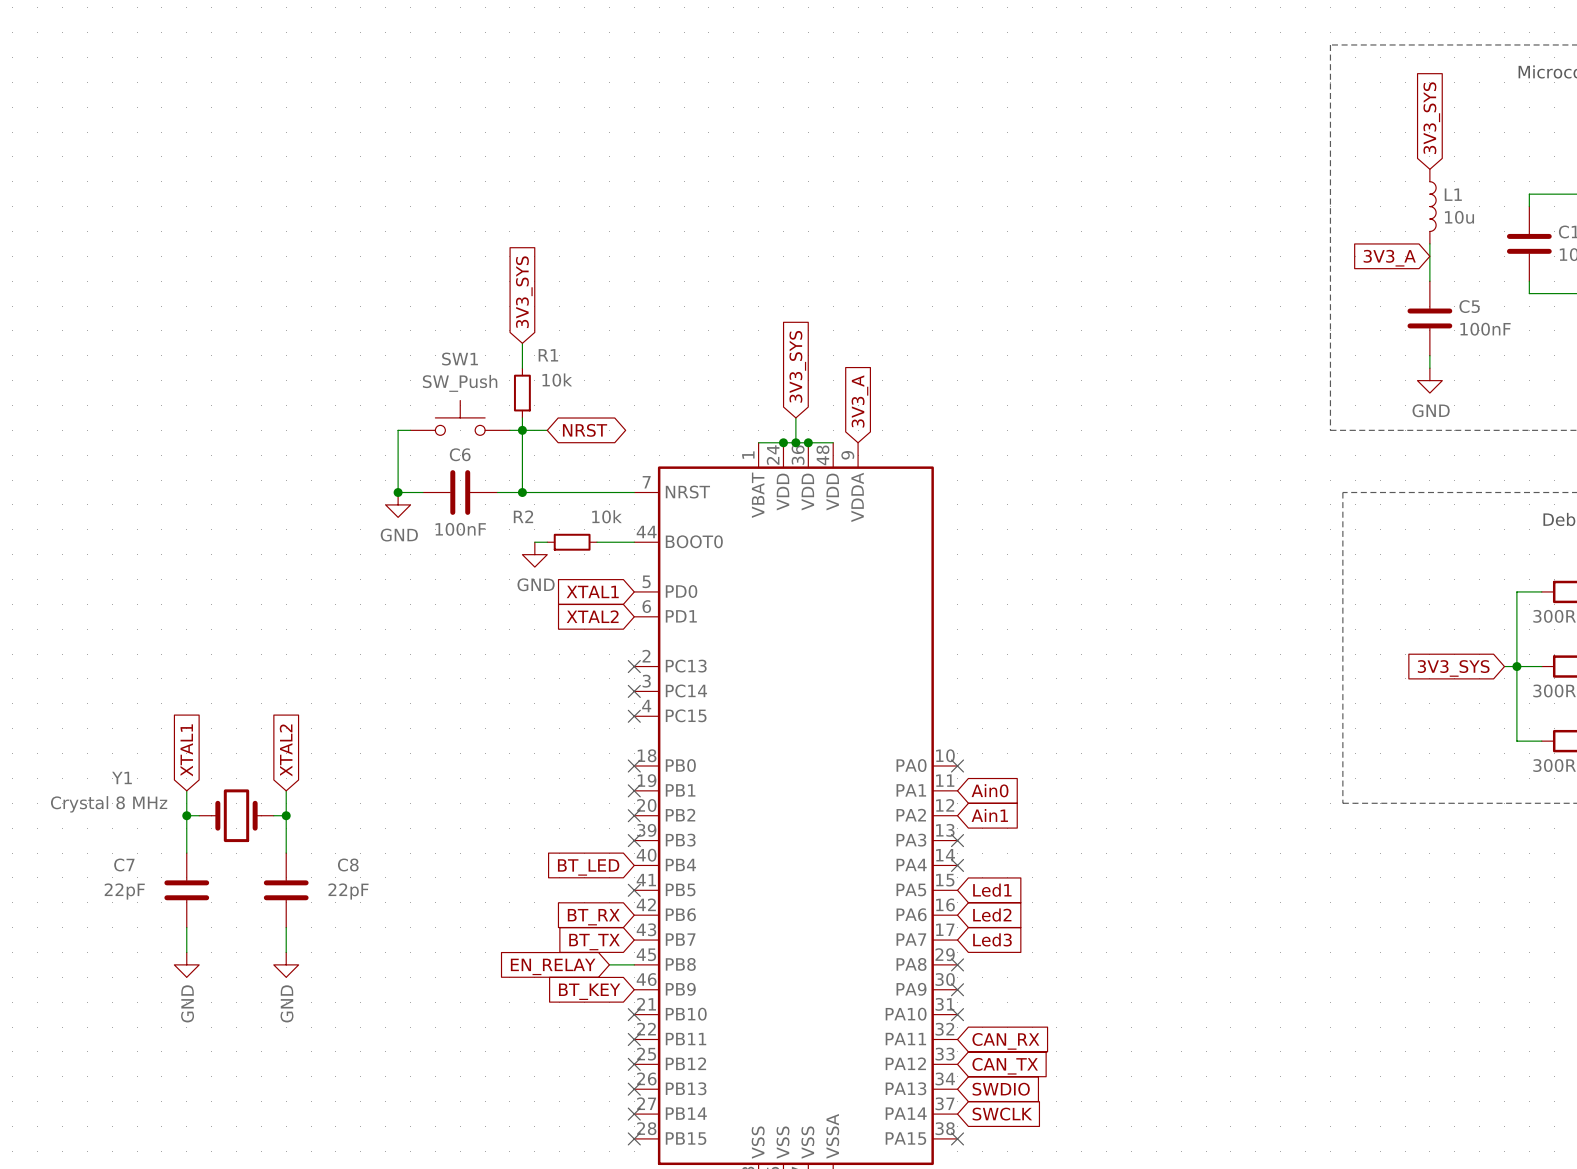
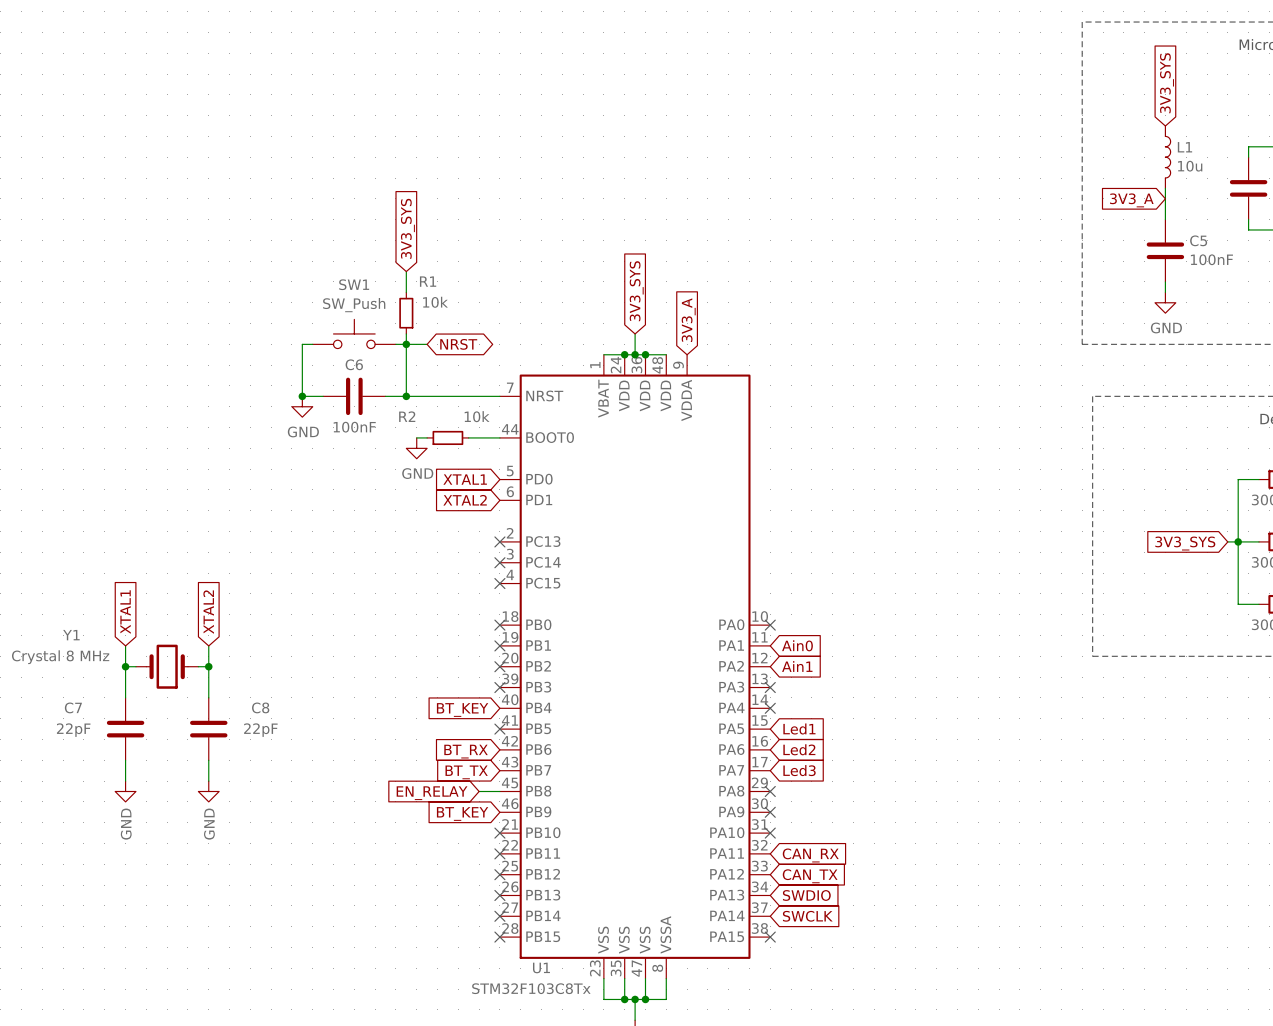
global label: BT_LED (588, 867) -> BT_KEY (462, 709)

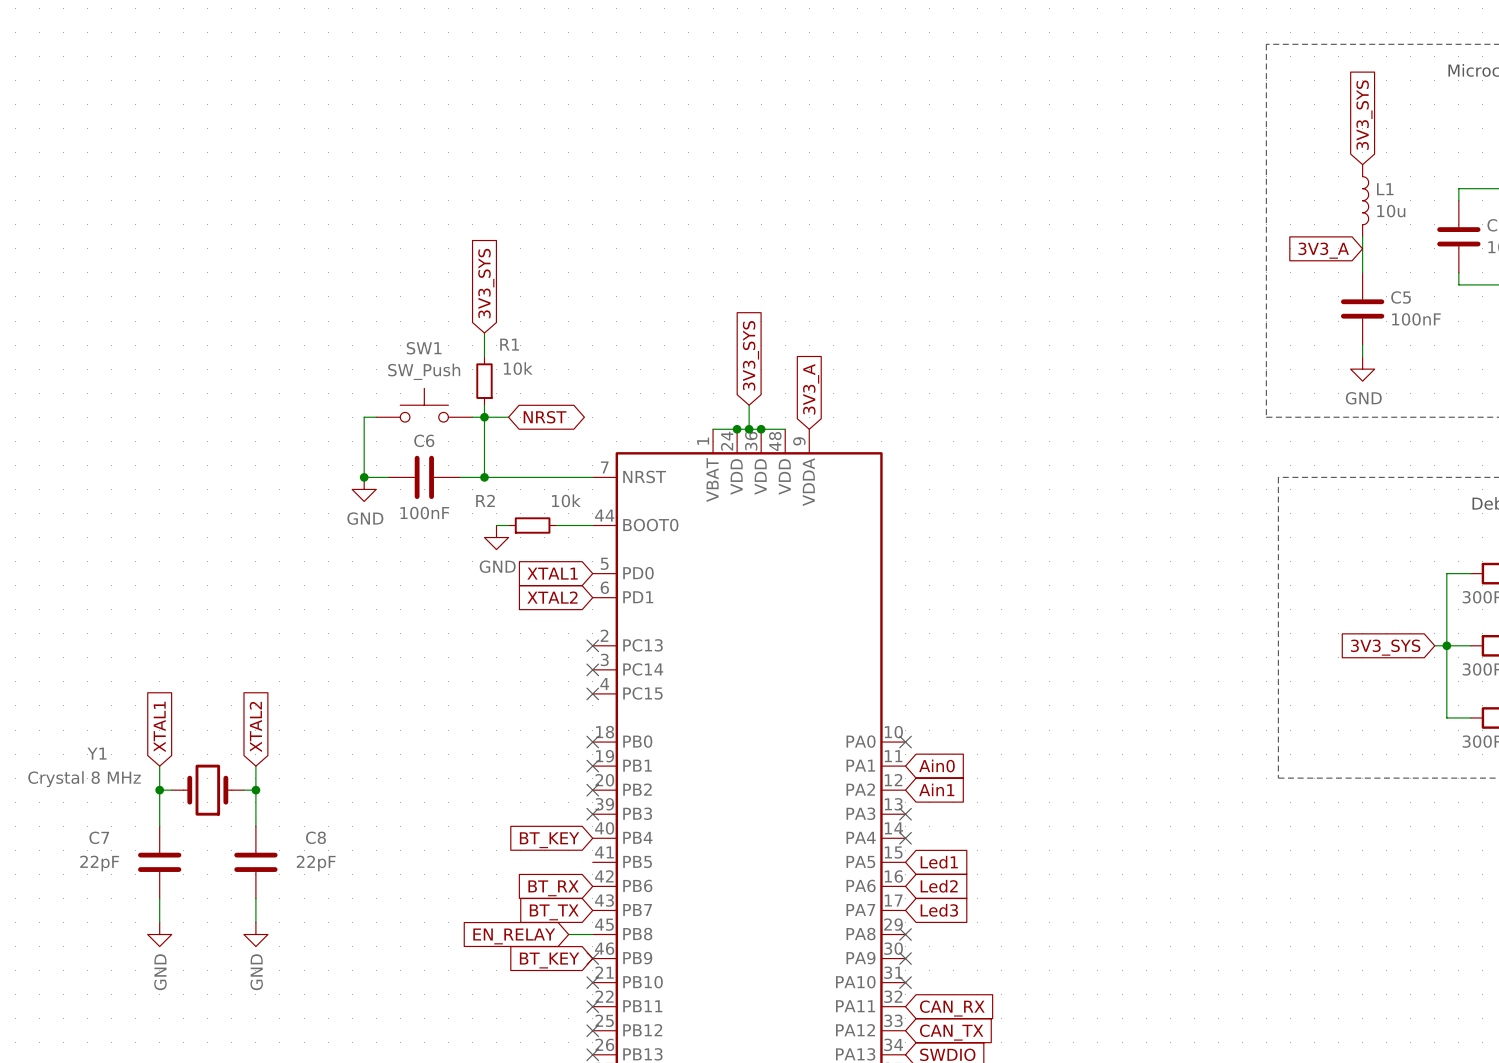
no-connect mark: (499, 729) -> none
no-connect mark: none -> (592, 958)

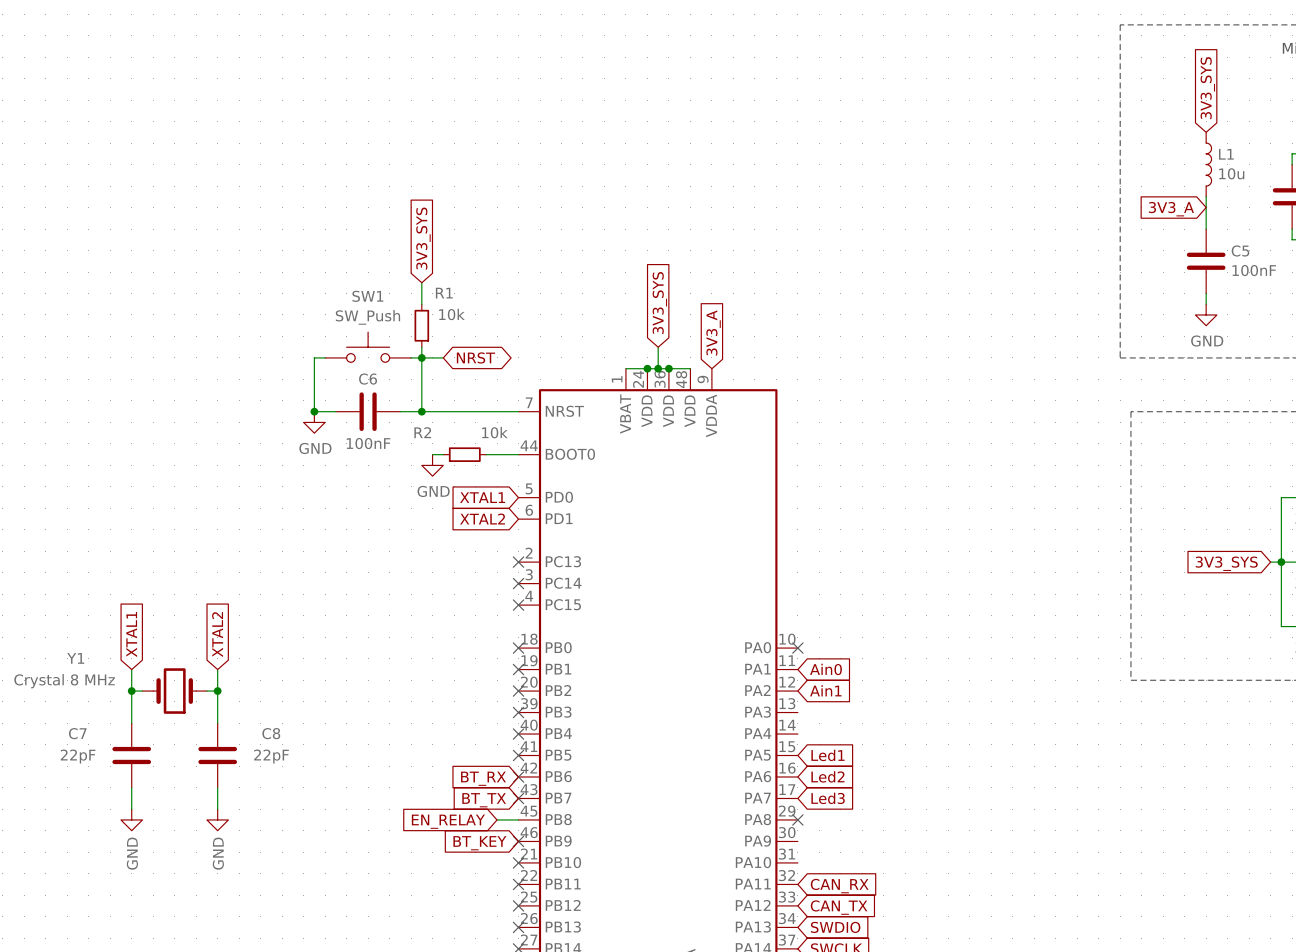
no-connect mark: (905, 814) -> none
no-connect mark: none -> (518, 734)
no-connect mark: (905, 838) -> none
global label: BT_KEY (549, 840) -> none
no-connect mark: none -> (518, 755)
no-connect mark: none -> (518, 776)
no-connect mark: none -> (518, 798)
no-connect mark: (905, 958) -> none
no-connect mark: (905, 982) -> none

